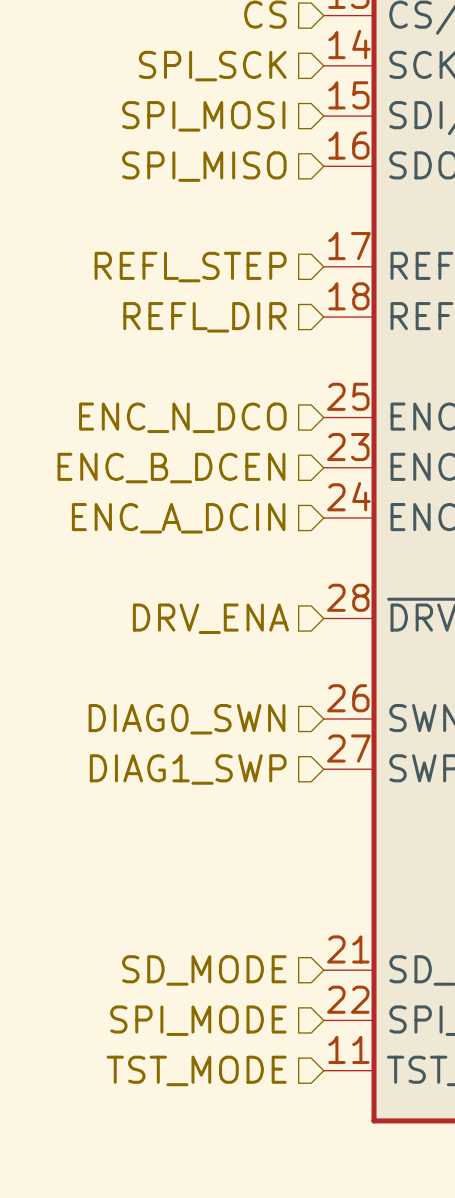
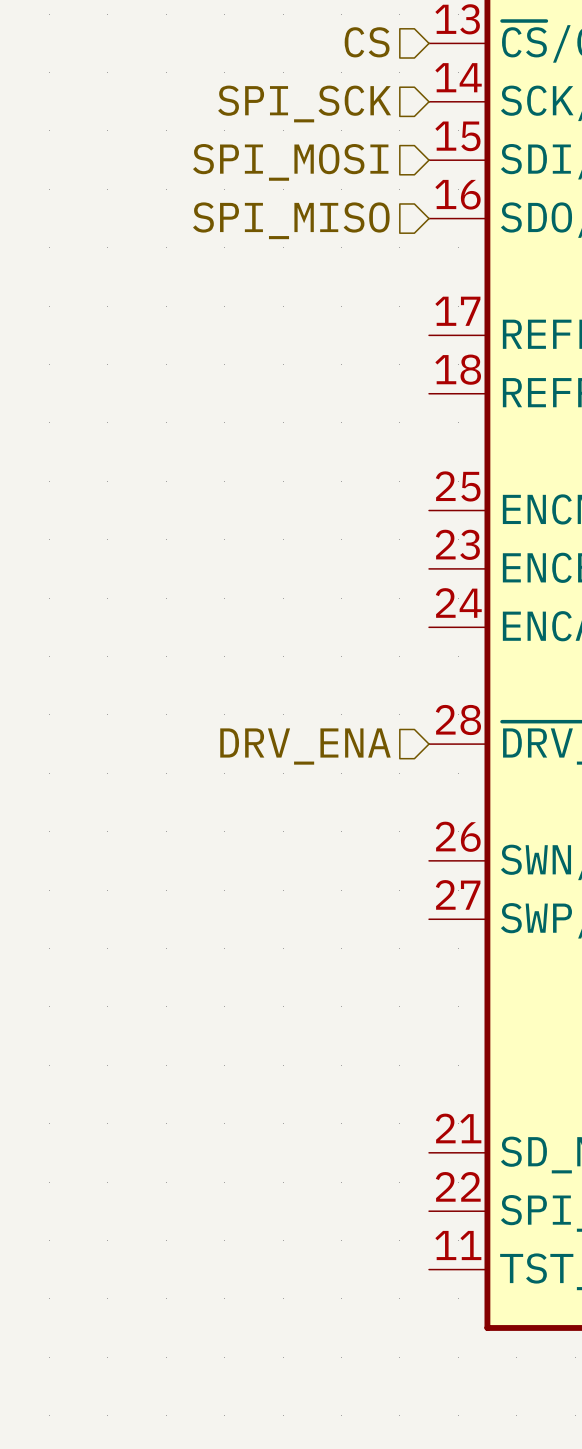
hierarchical label: REFL_STEP (190, 267) -> none
hierarchical label: REFL_DIR (204, 317) -> none
hierarchical label: ENC_N_DCO (182, 417) -> none
hierarchical label: ENC_B_DCEN (171, 468) -> none
hierarchical label: ENC_A_DCIN (178, 518) -> none
hierarchical label: DIAG0_SWN (187, 719) -> none
hierarchical label: DIAG1_SWP (188, 769) -> none
hierarchical label: SD_MODE (204, 970) -> none
hierarchical label: SPI_MODE (198, 1020) -> none
hierarchical label: TST_MODE (196, 1070) -> none

